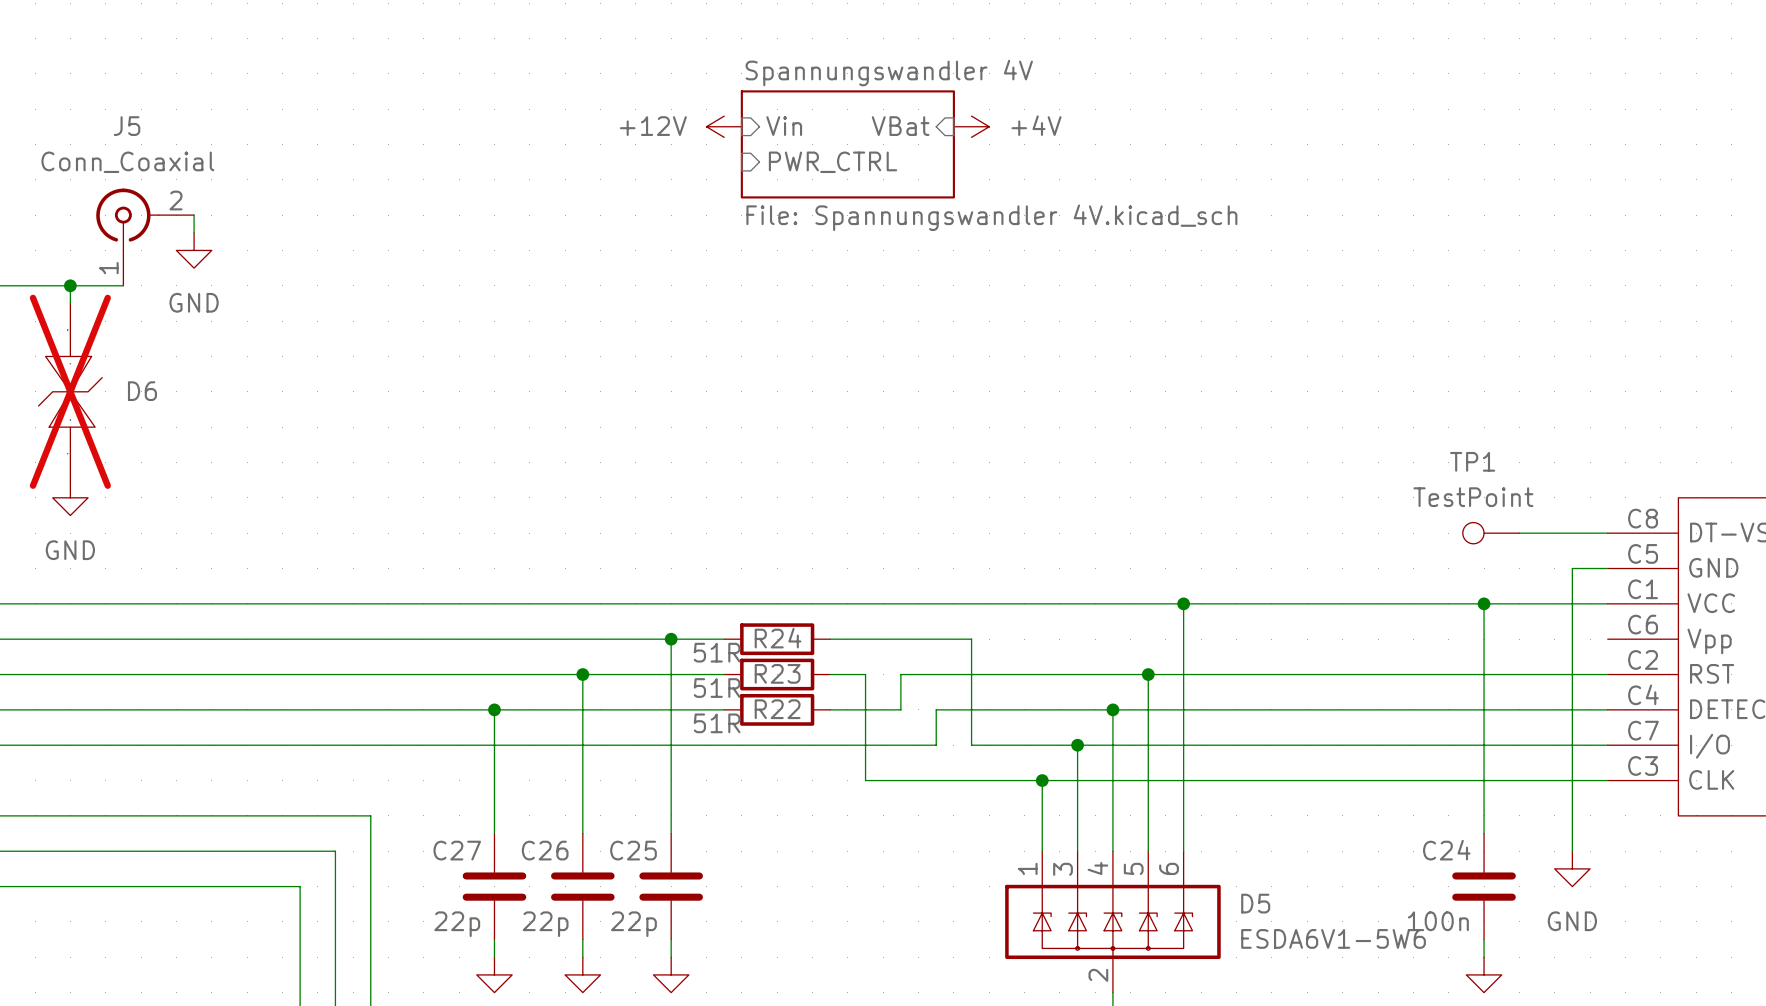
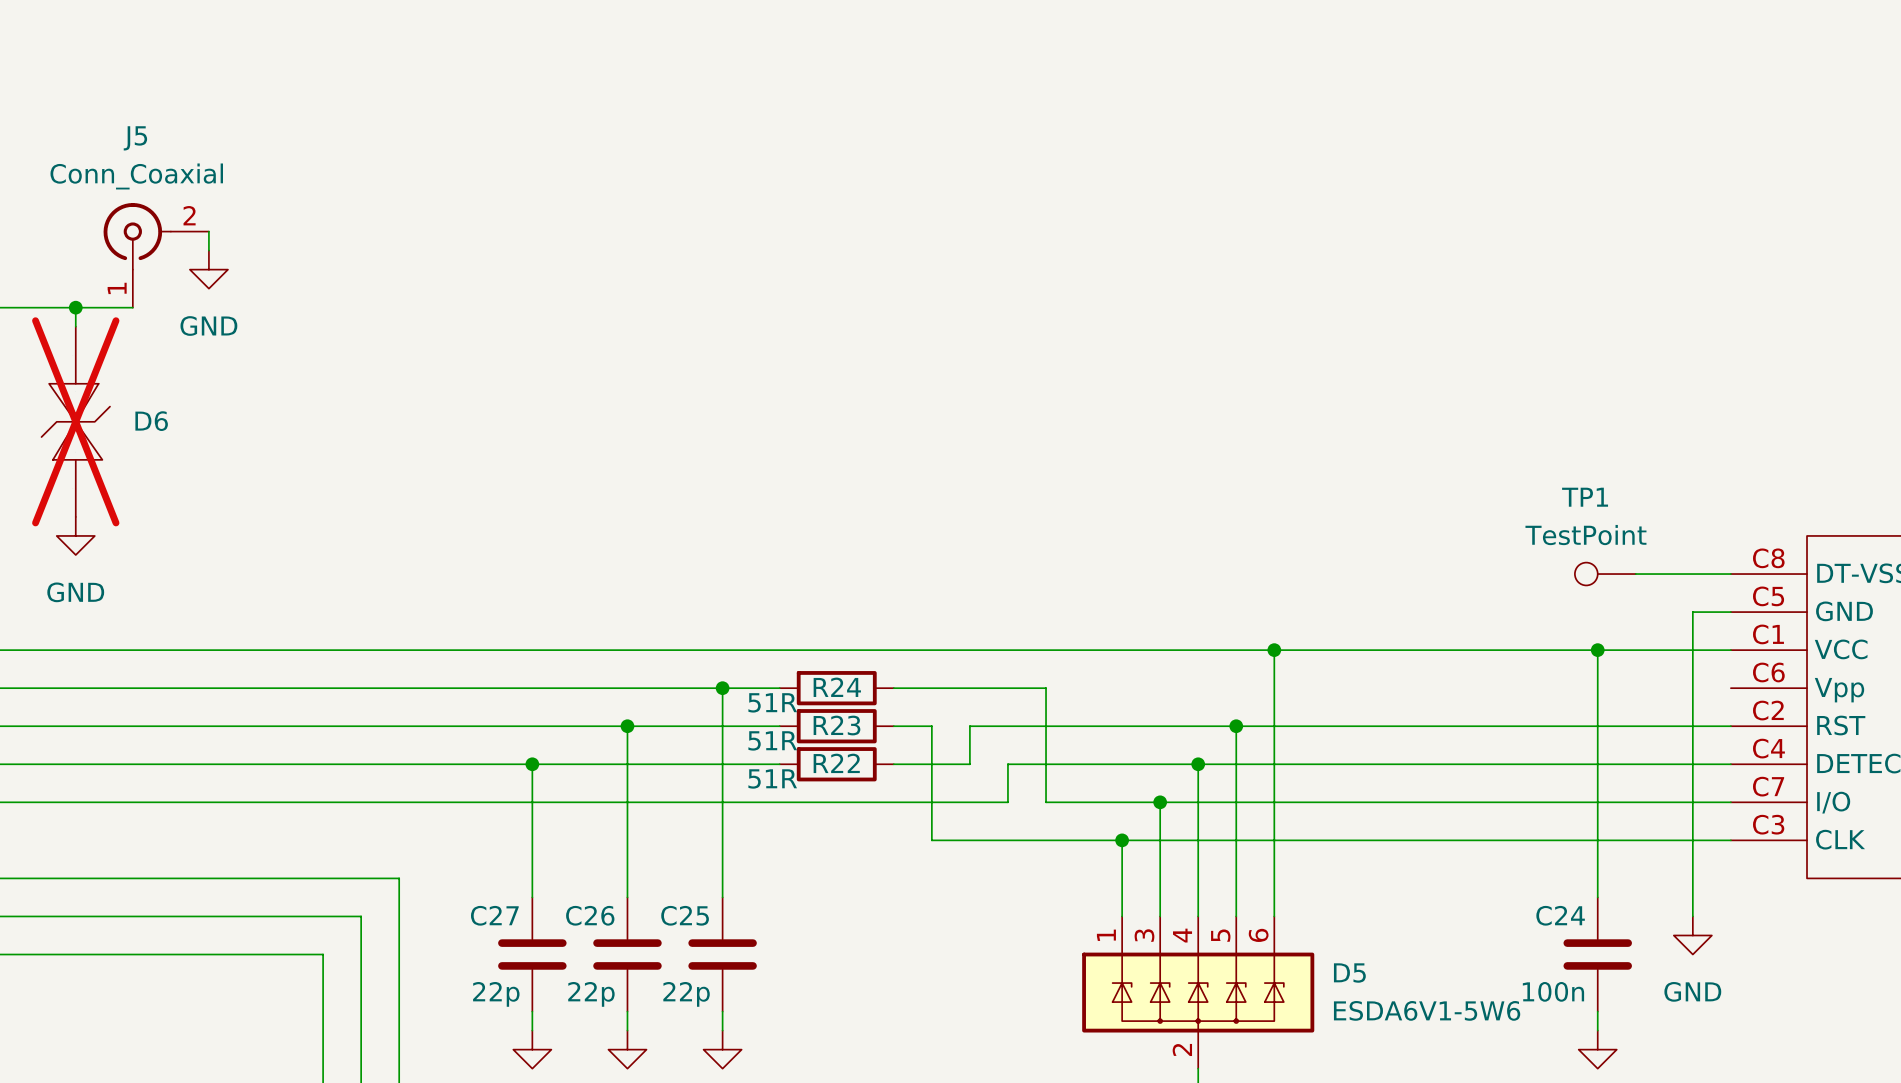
power symbol: +12V (724, 126) -> none
sheet pin: Vin (784, 126) -> none
sheet pin: VBat (900, 126) -> none
power symbol: +4V (971, 126) -> none
sheet Spannungswandler 4V: File: Spannungswandler 4V.kicad_sch (847, 144) -> none
sheet pin: PWR_CTRL (833, 162) -> none

